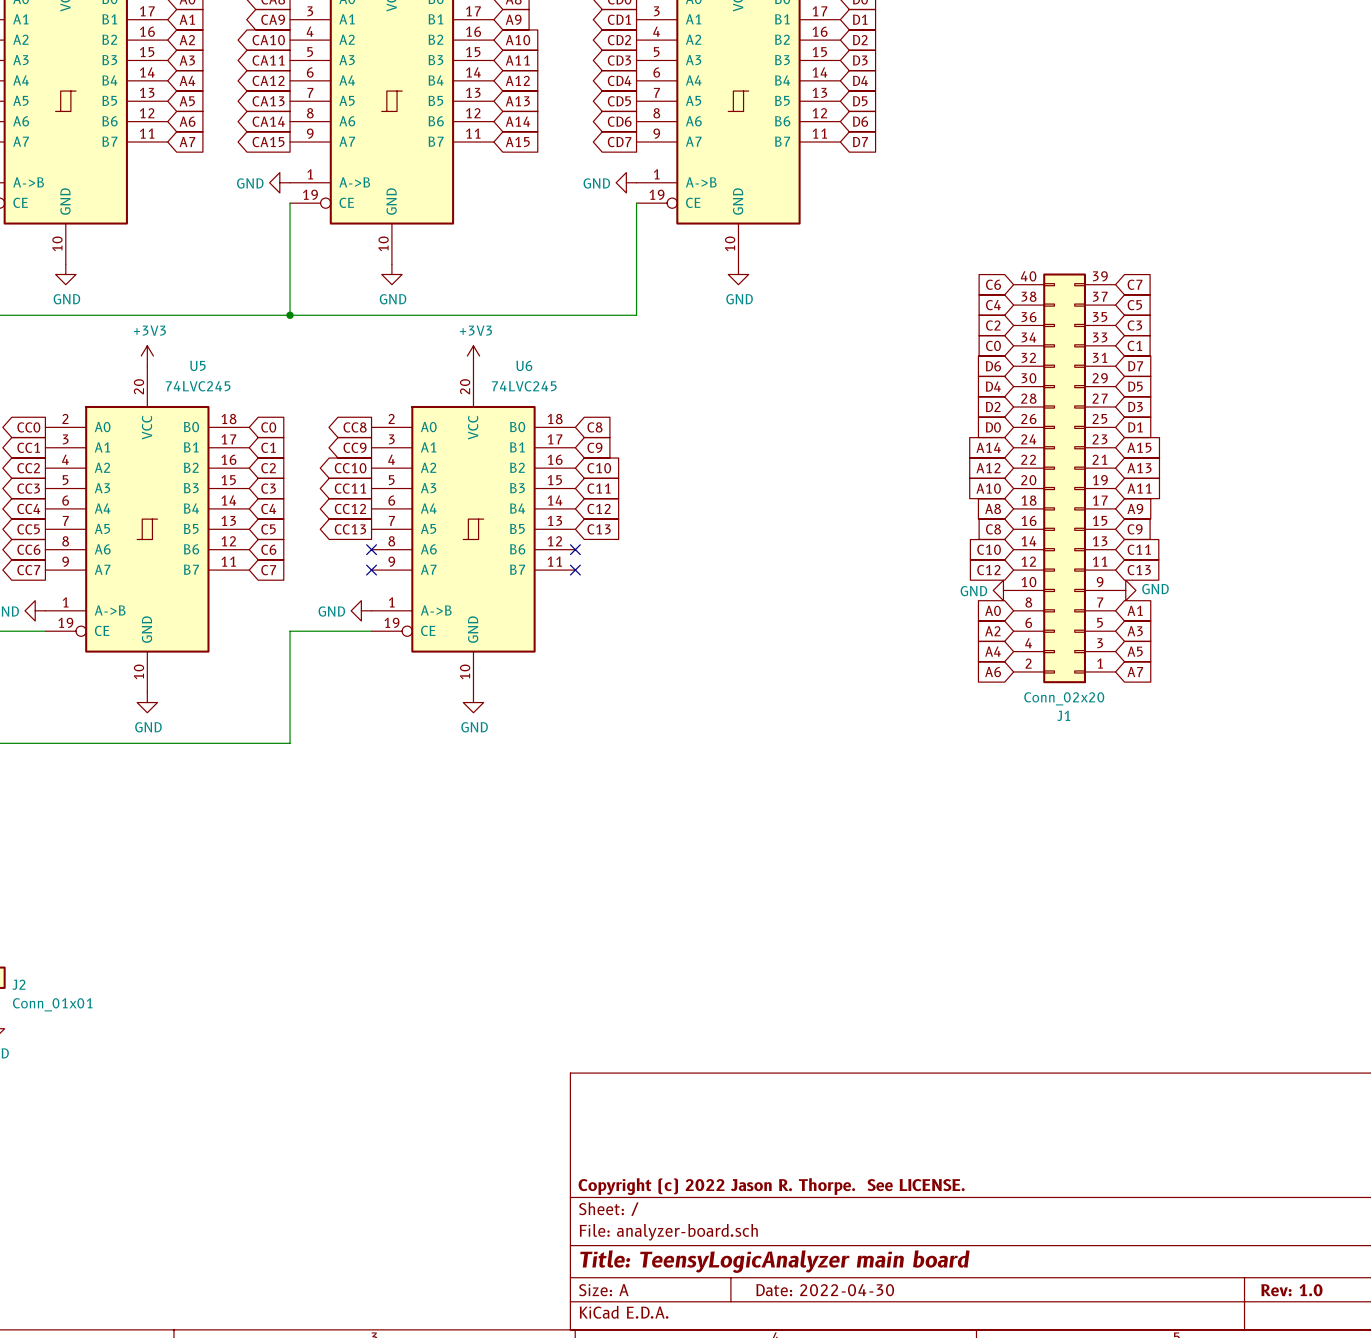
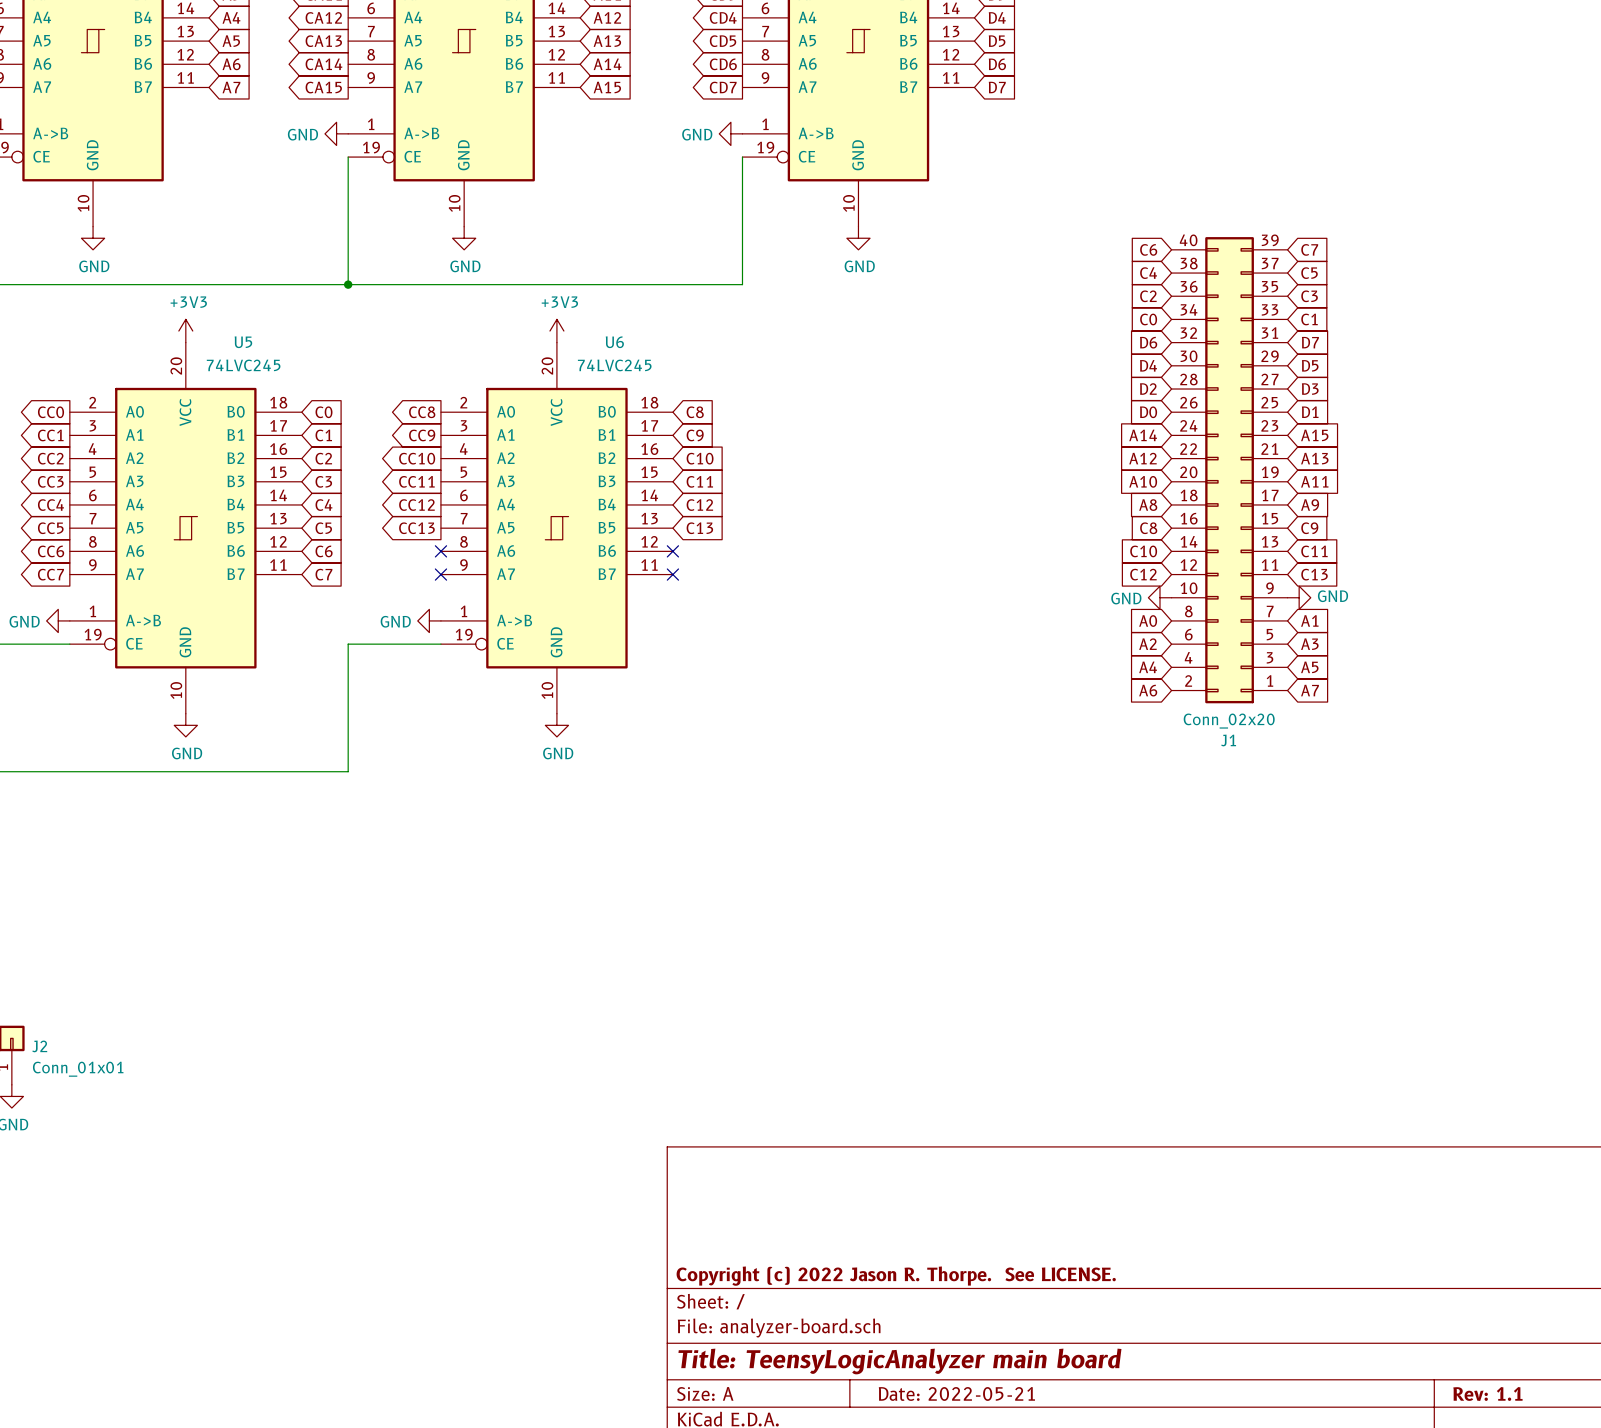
title block: Date: 2022-04-30 (825, 1290) -> Date: 2022-05-21 (956, 1393)
title block: Rev: 1.0 (1291, 1290) -> Rev: 1.1 (1487, 1394)

